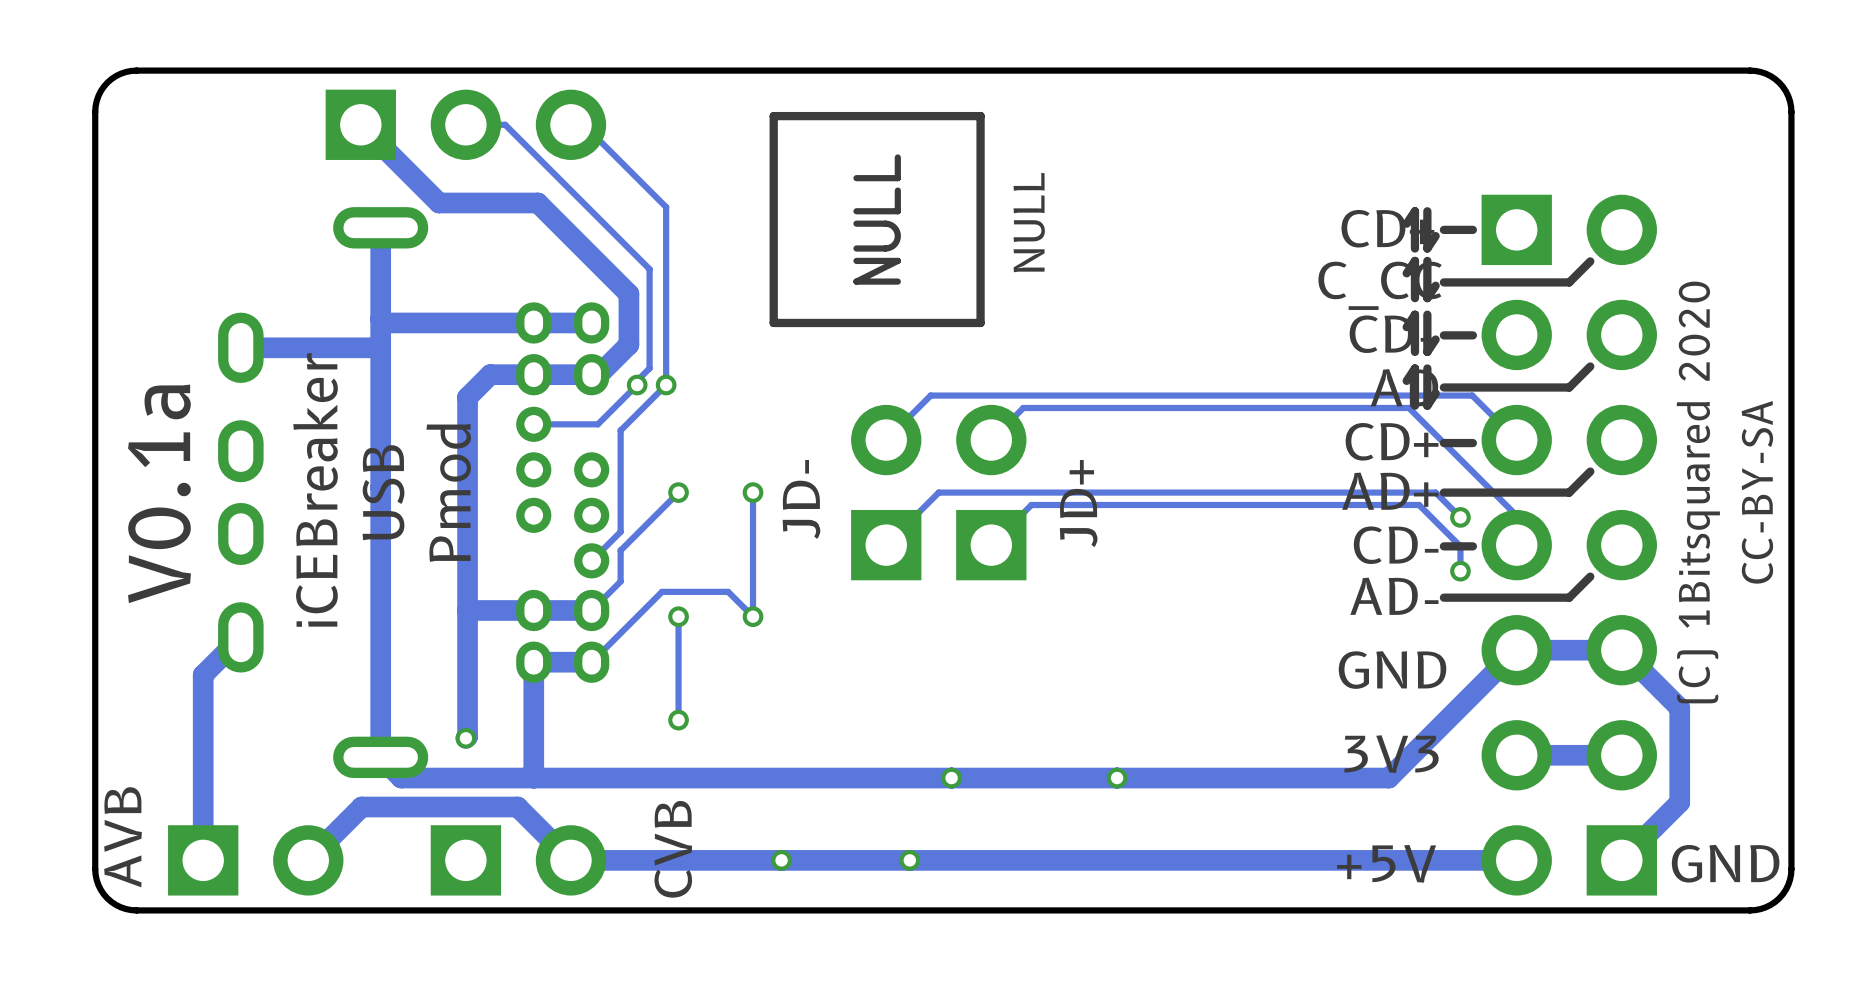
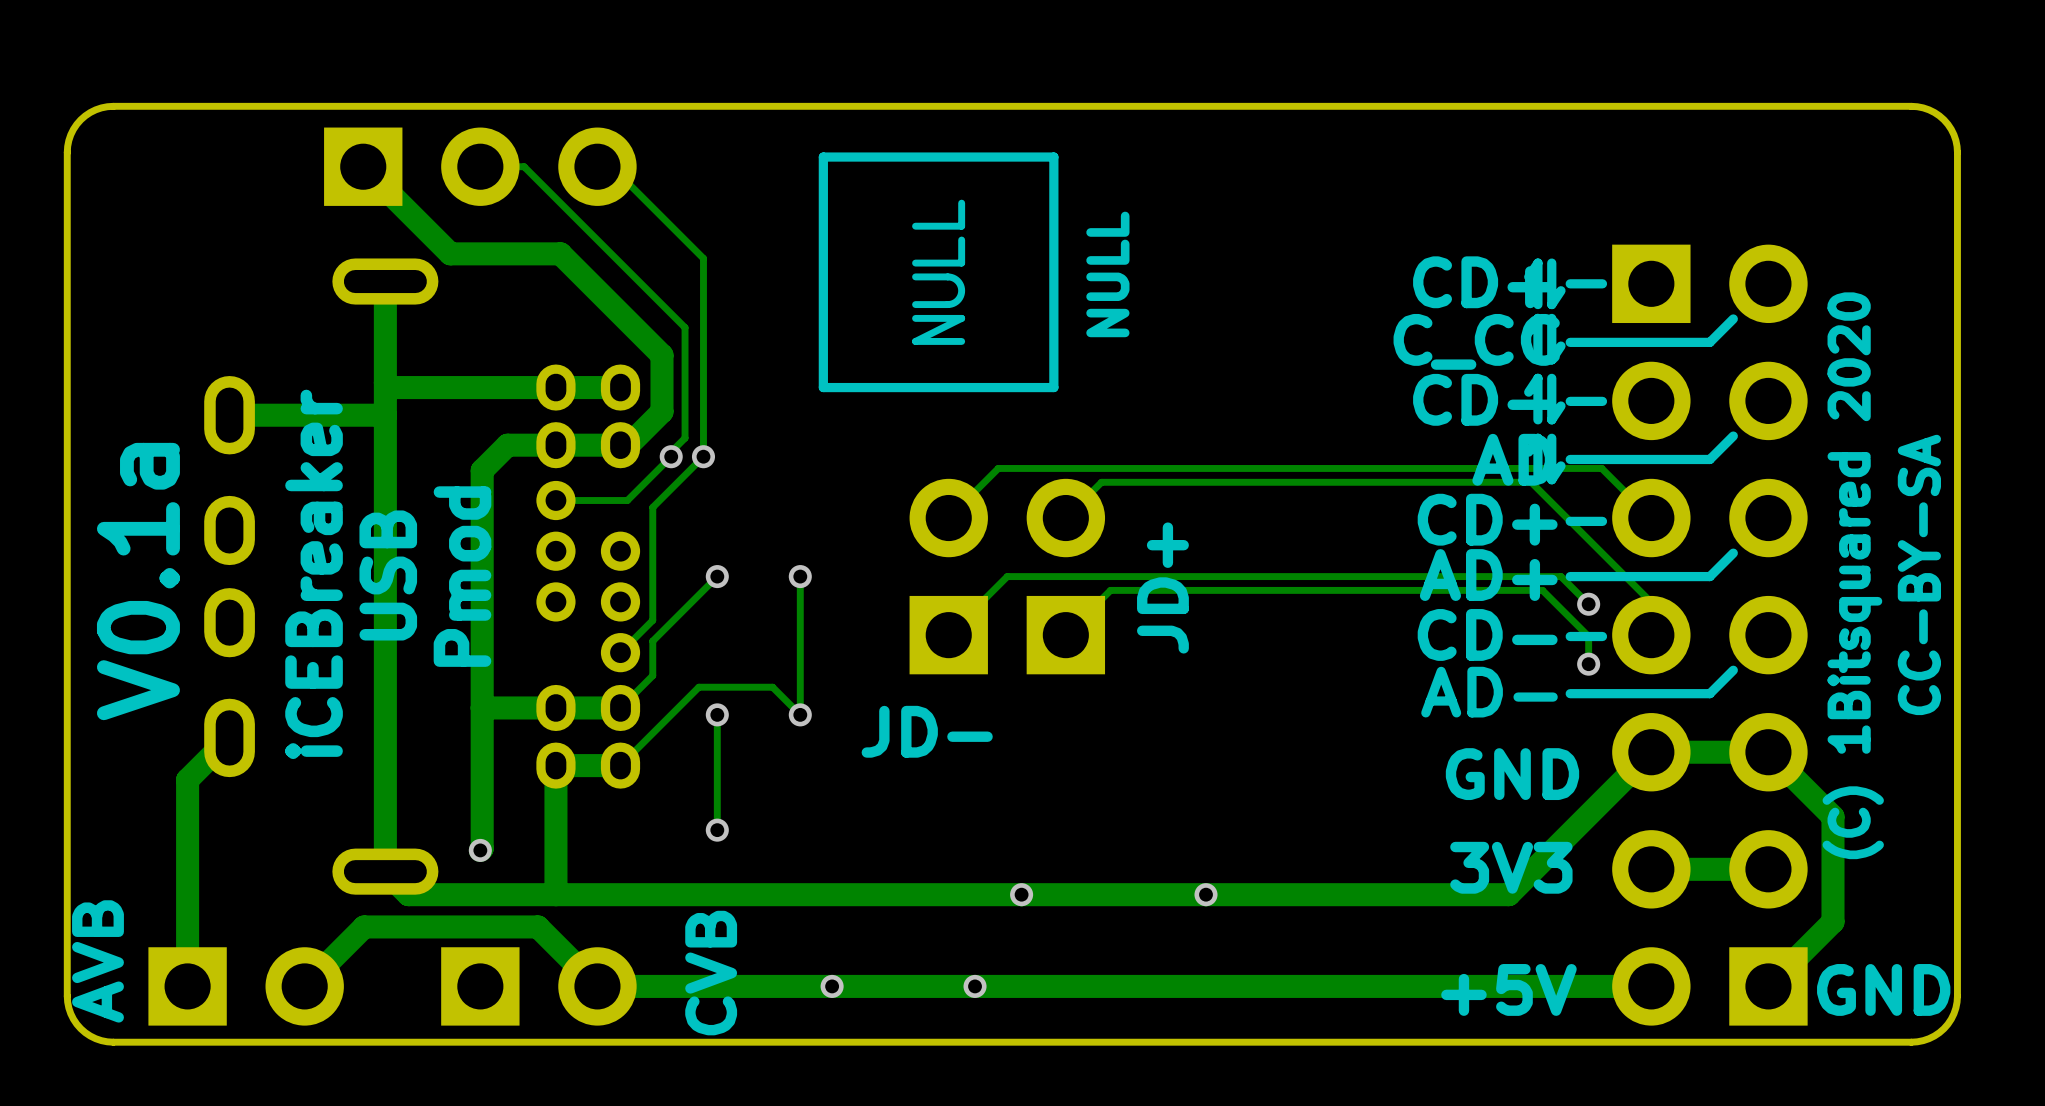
text rotation: 0° (801, 499) -> 90° clockwise (927, 731)

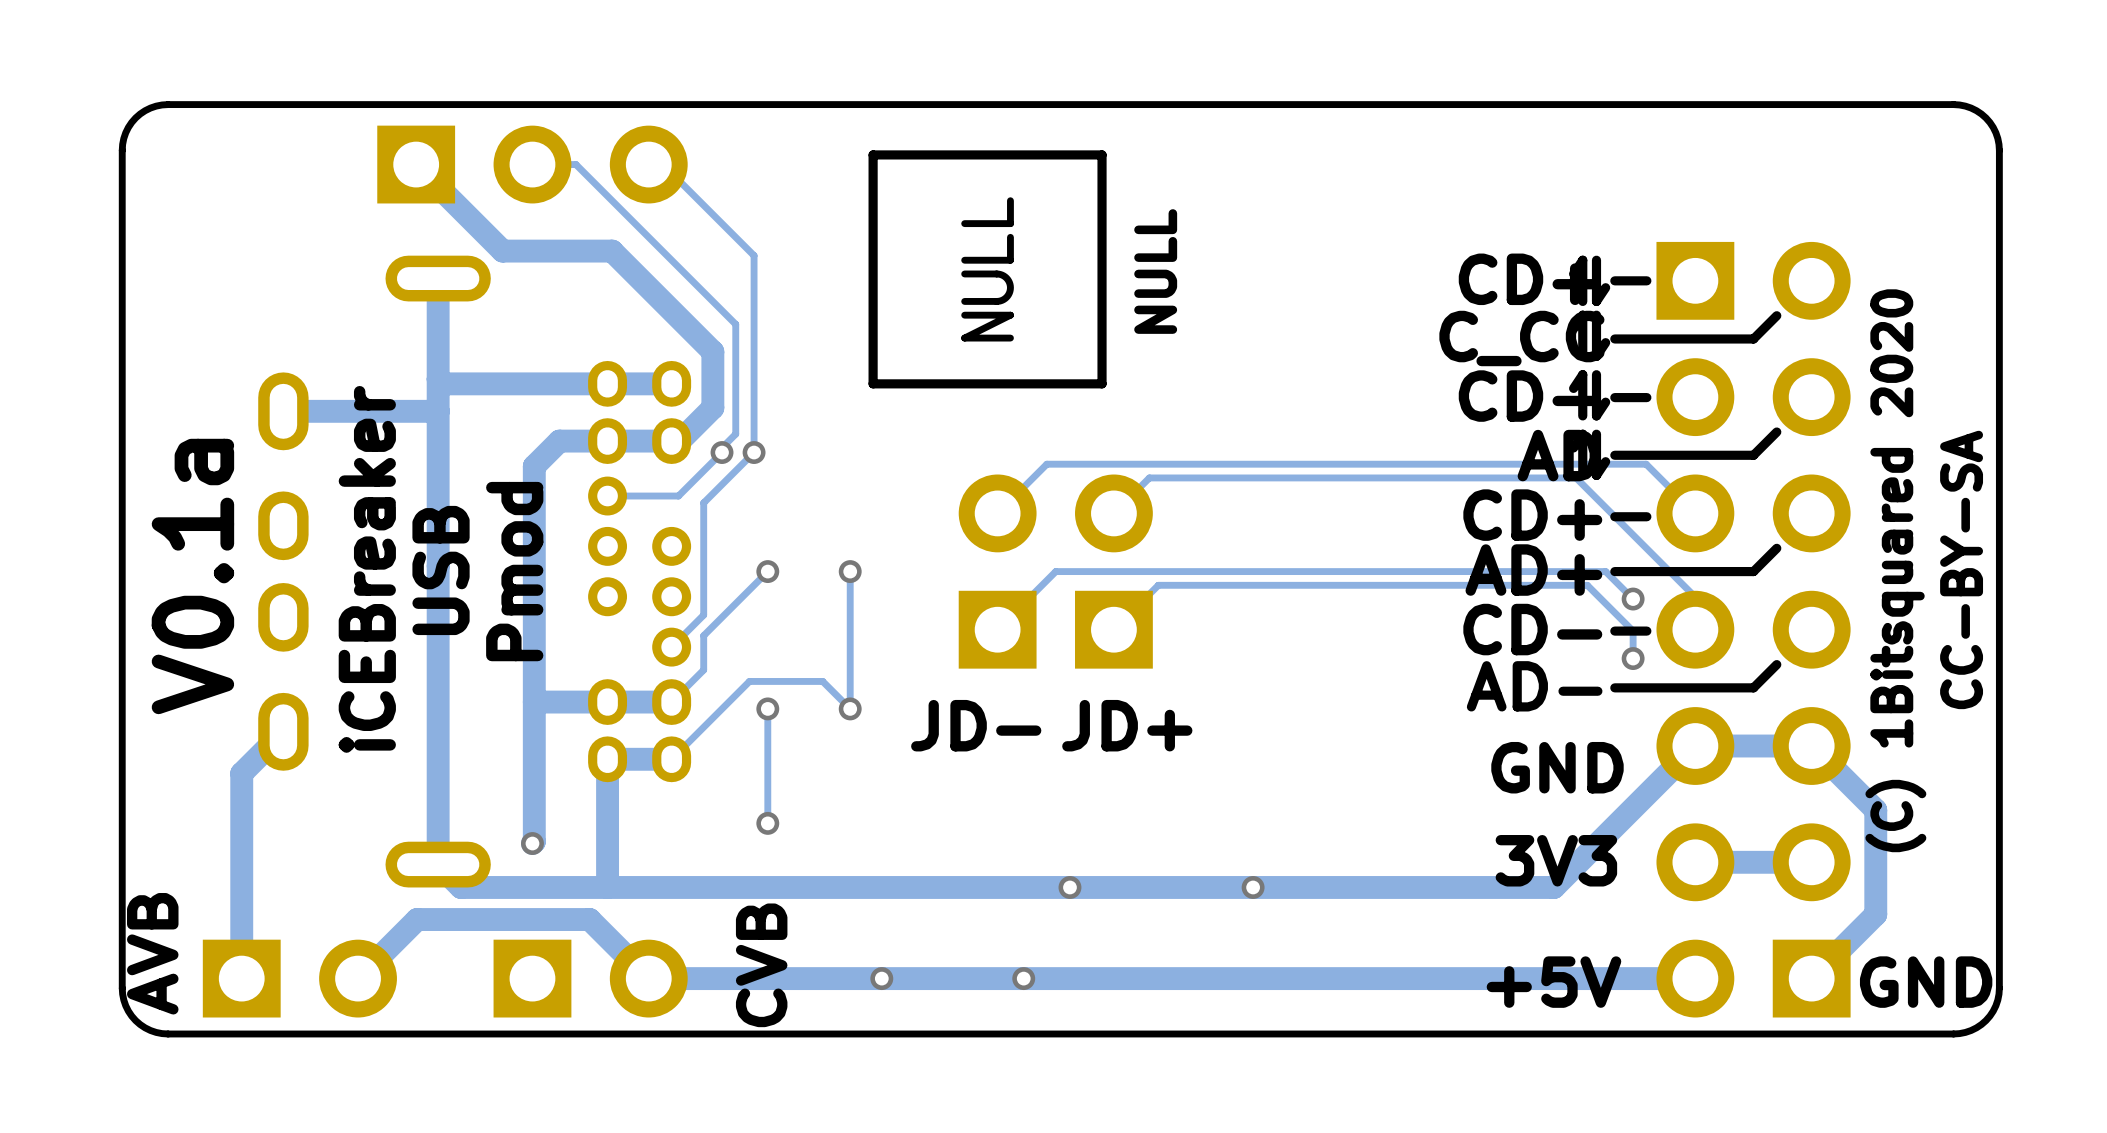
text rotation: 0° (1162, 587) -> 90° clockwise (1127, 725)

